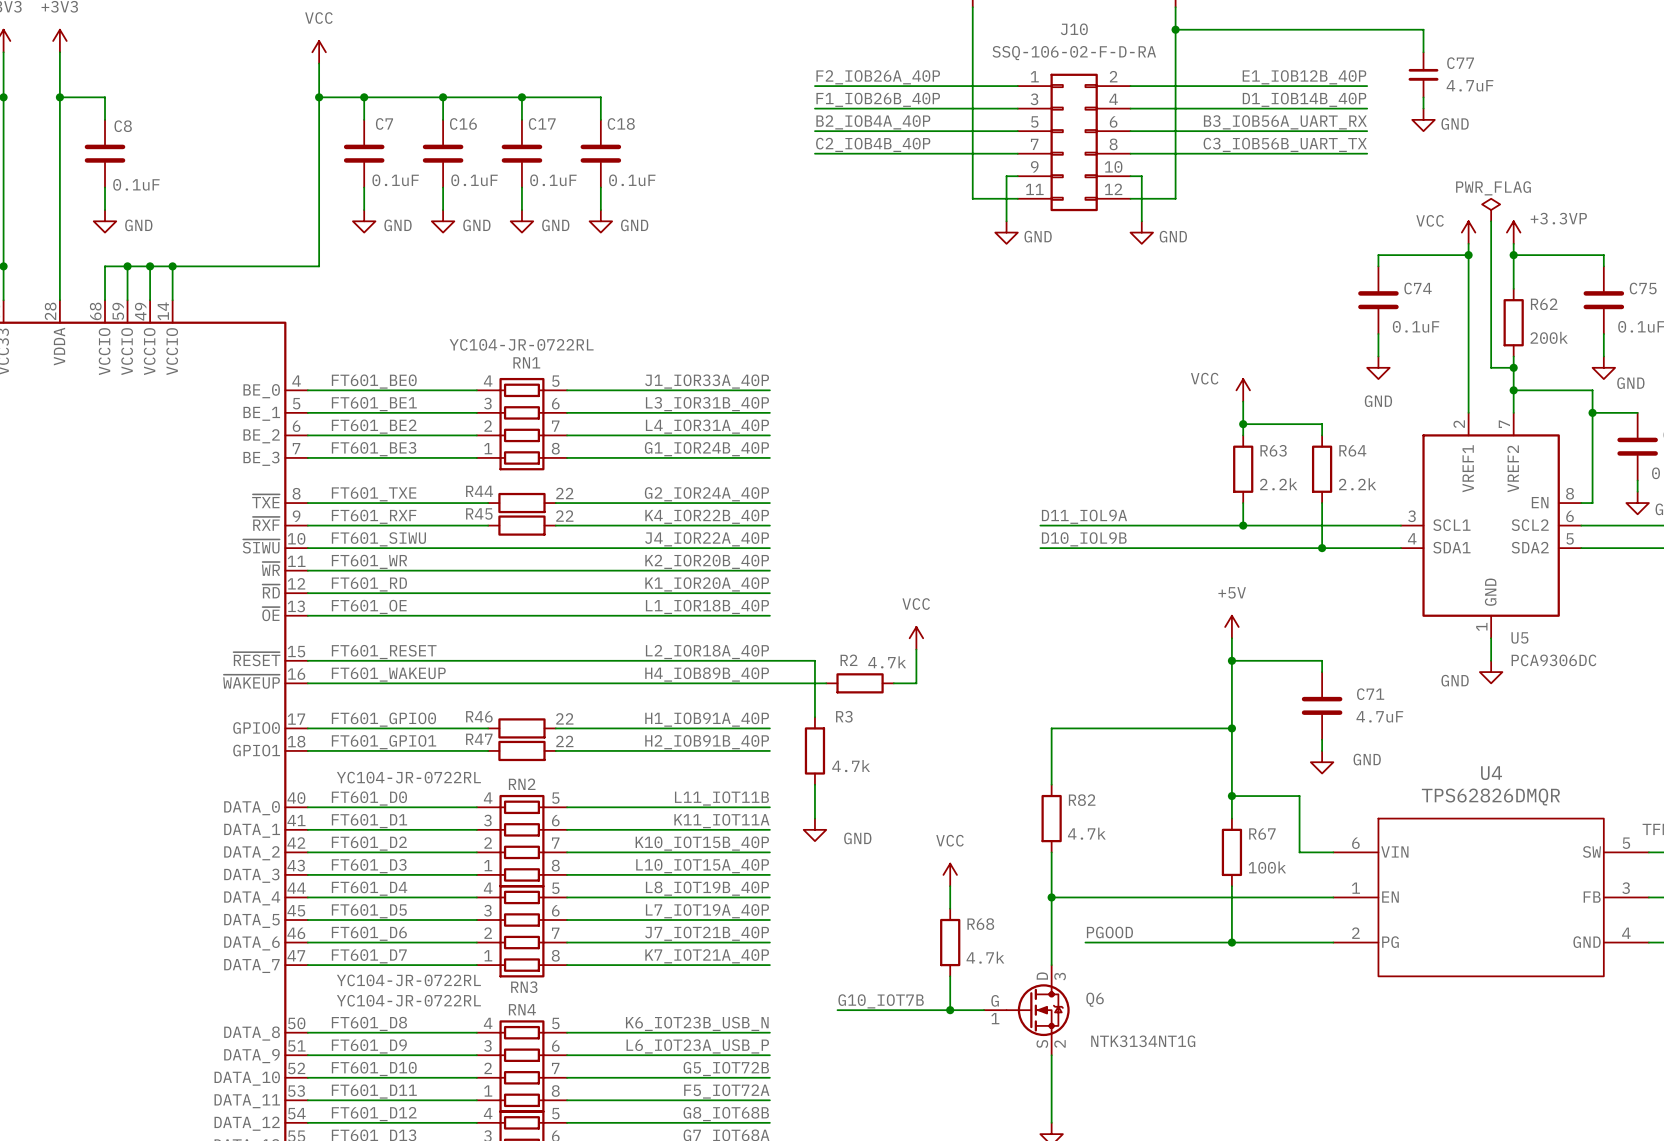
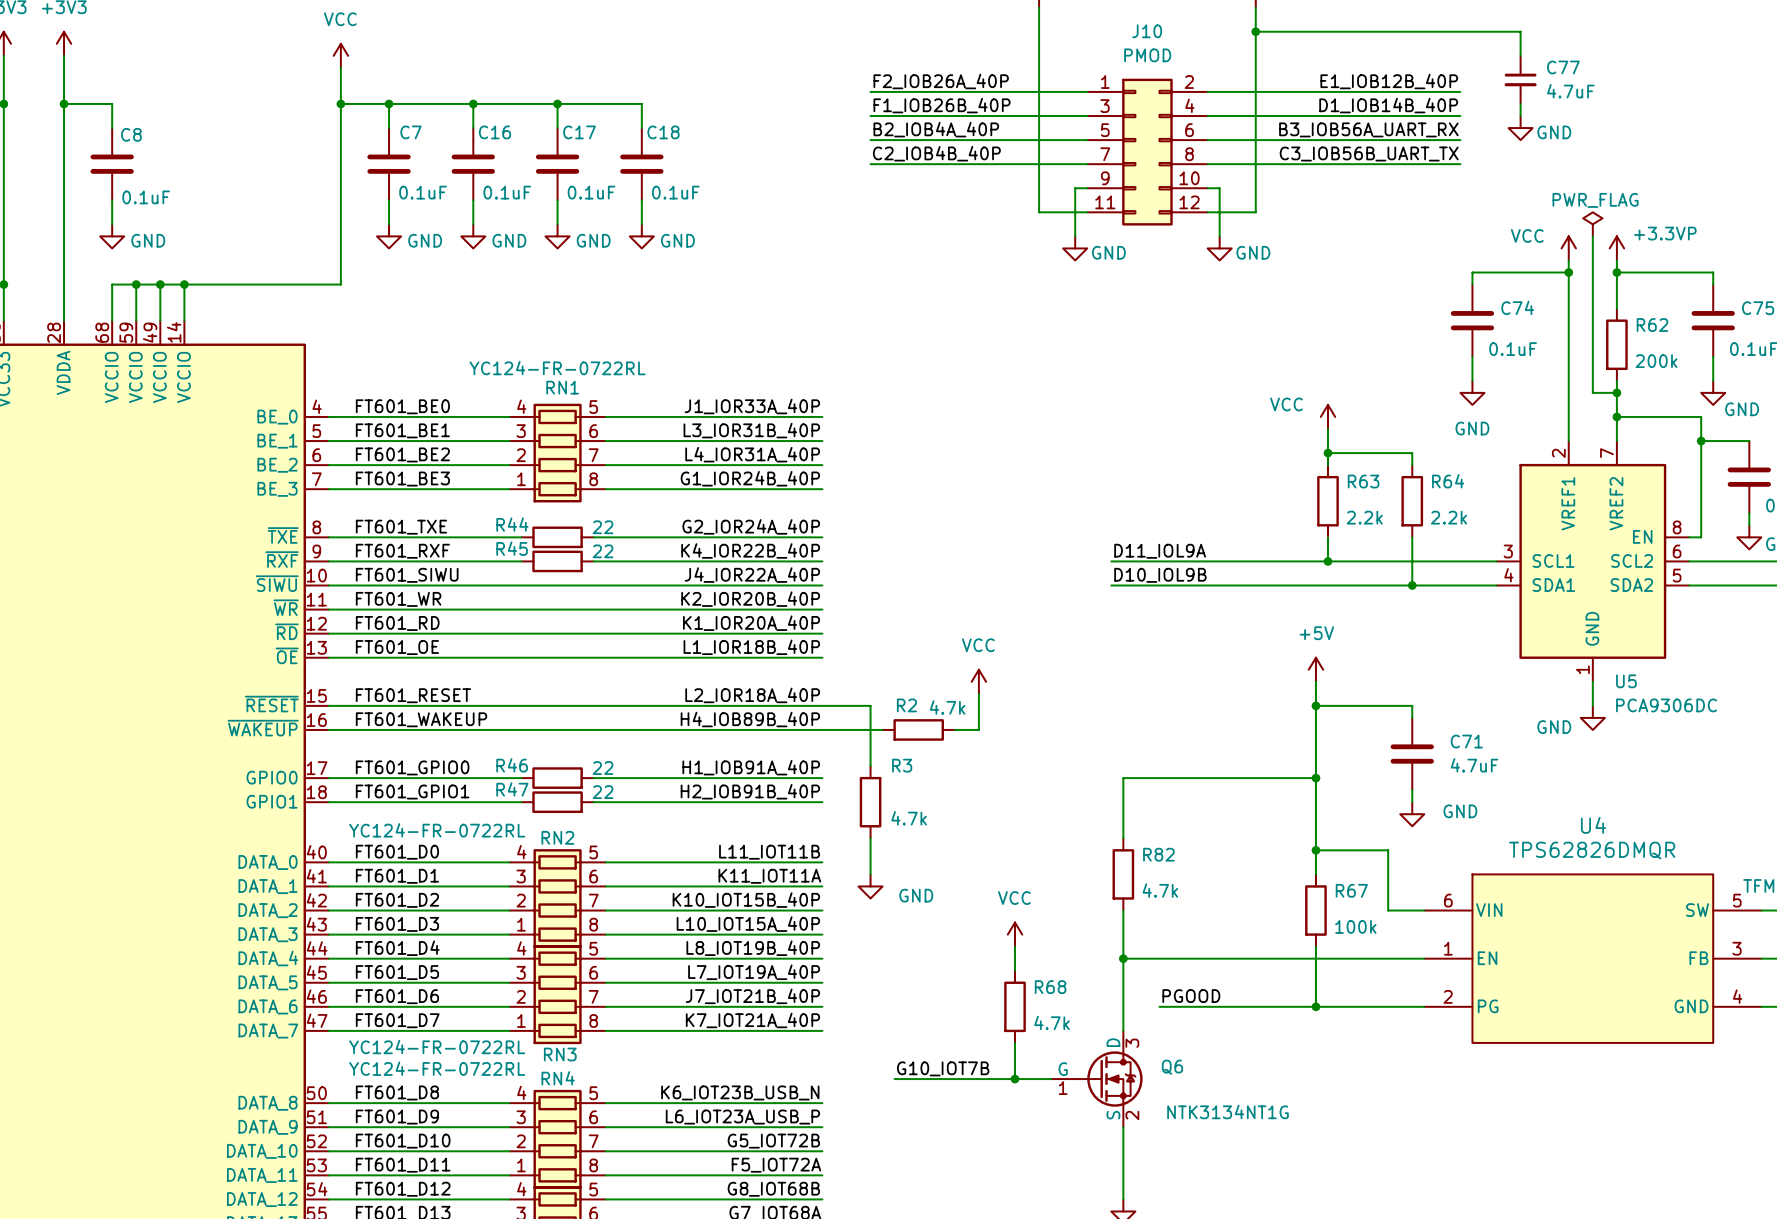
J10 value: SSQ-106-02-F-D-RA (1074, 53) -> PMOD (1147, 55)
RN1 value: YC104-JR-0722RL (521, 344) -> YC124-FR-0722RL (557, 368)
RN2 value: YC104-JR-0722RL (408, 777) -> YC124-FR-0722RL (437, 830)
RN3 value: YC104-JR-0722RL (408, 980) -> YC124-FR-0722RL (437, 1047)
RN4 value: YC104-JR-0722RL (408, 1000) -> YC124-FR-0722RL (437, 1068)

